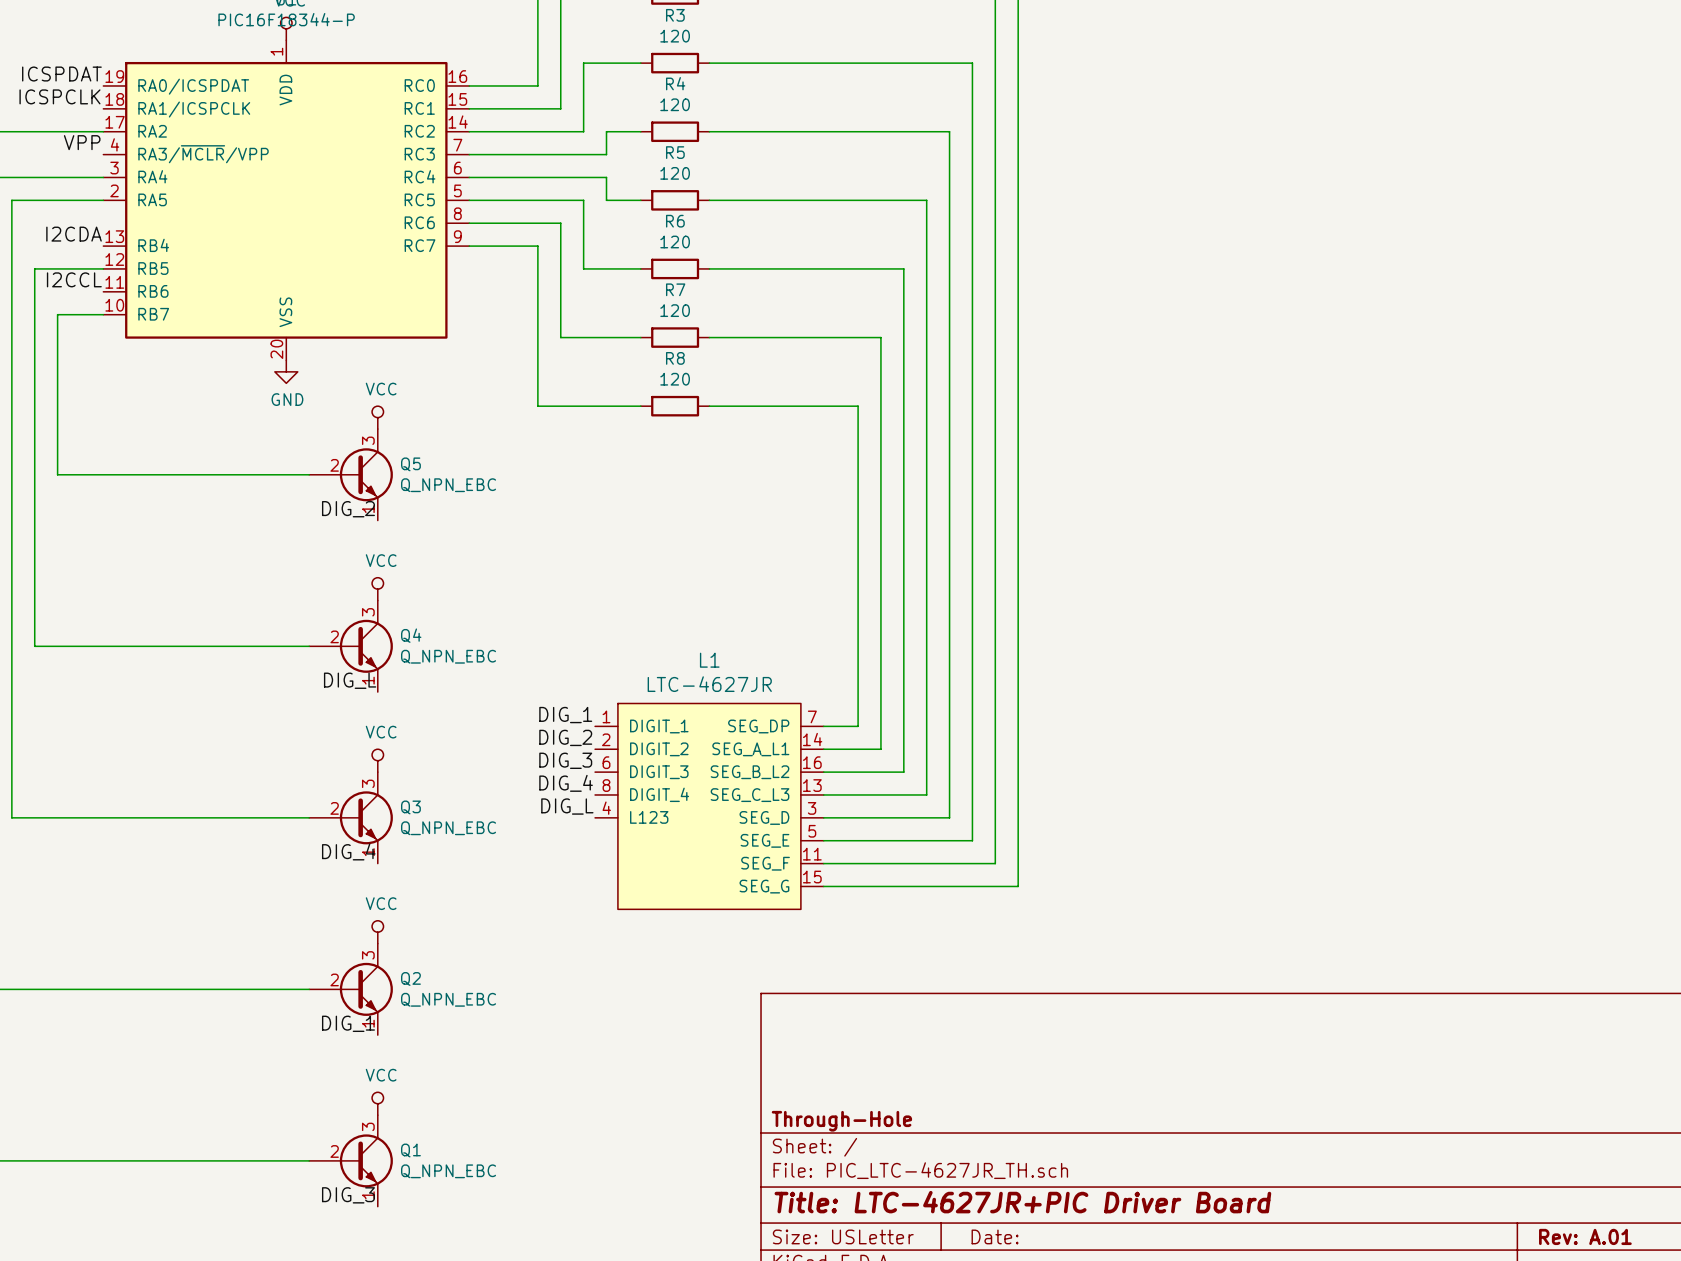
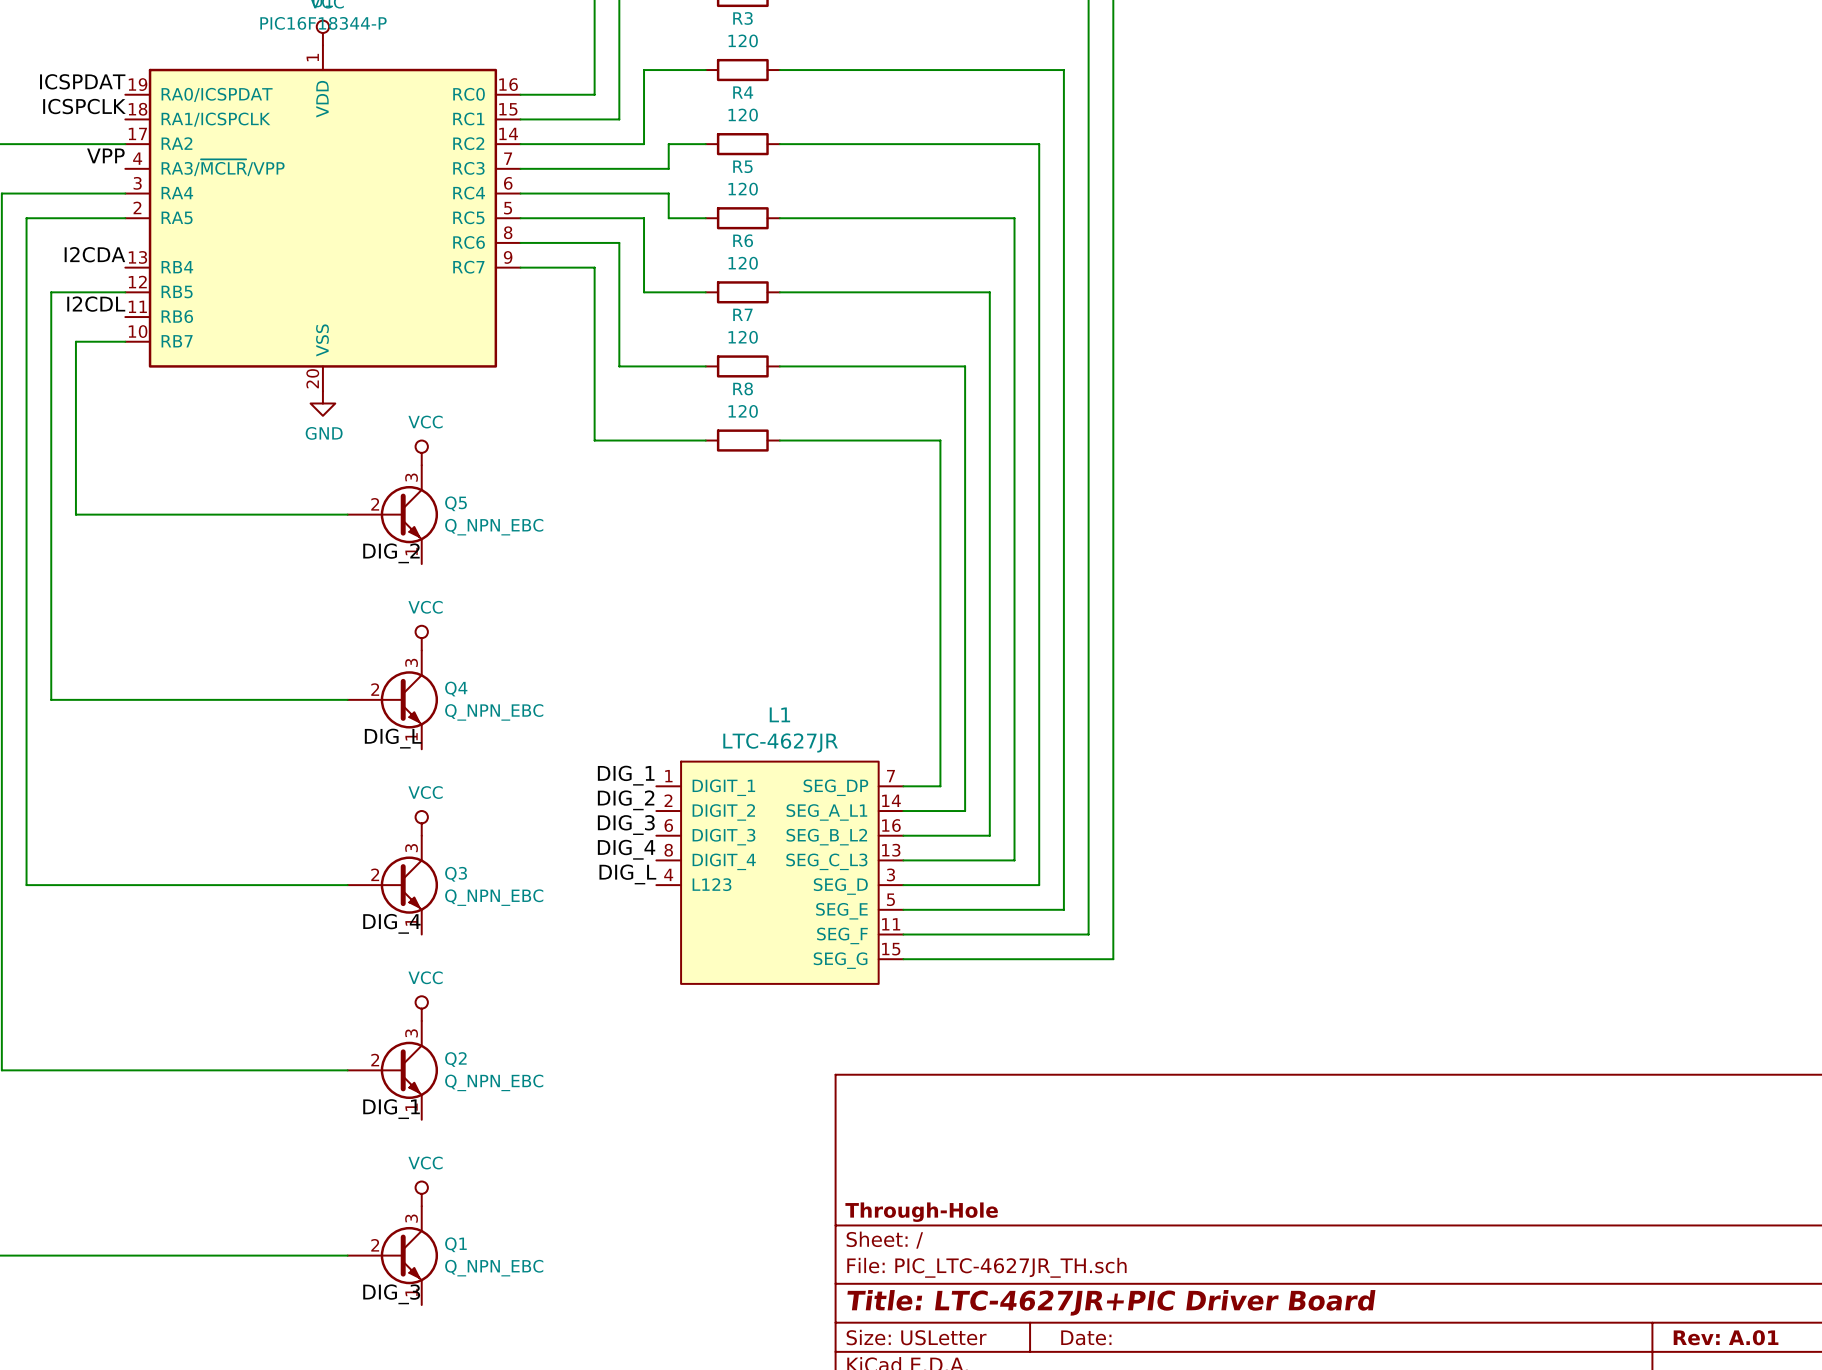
label: I2CCL (74, 279) -> I2CDL (96, 304)

